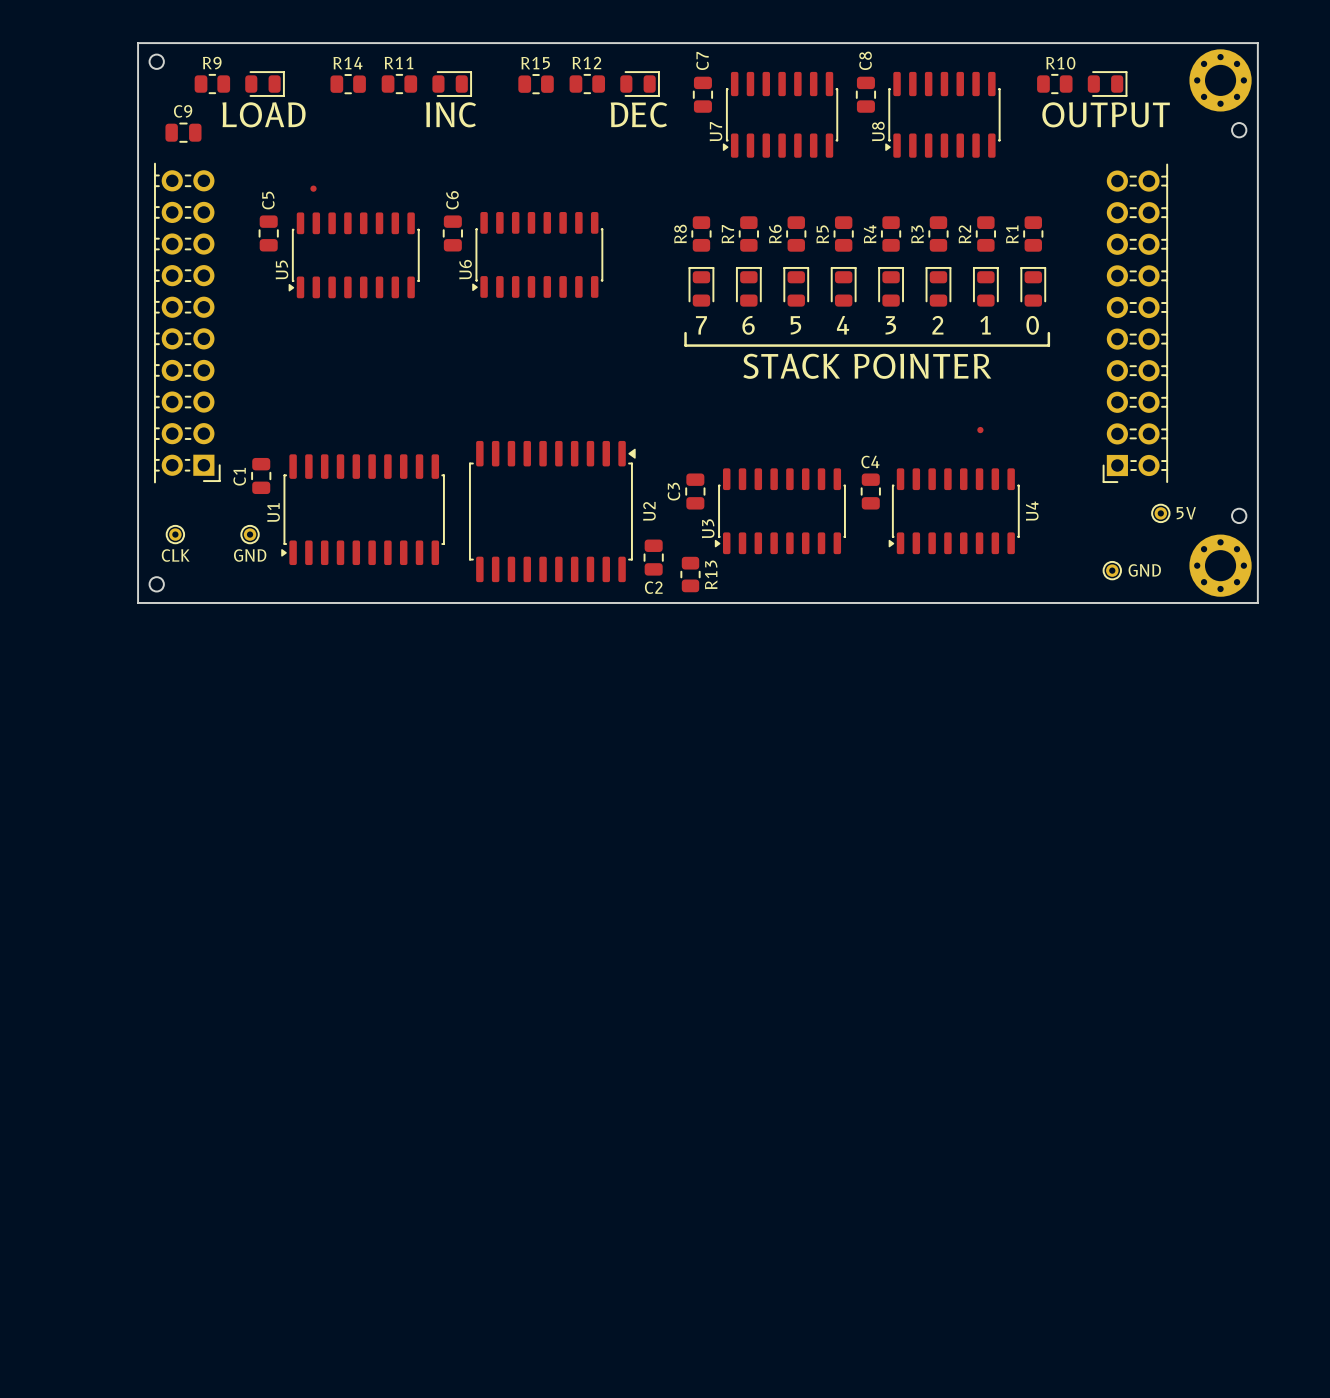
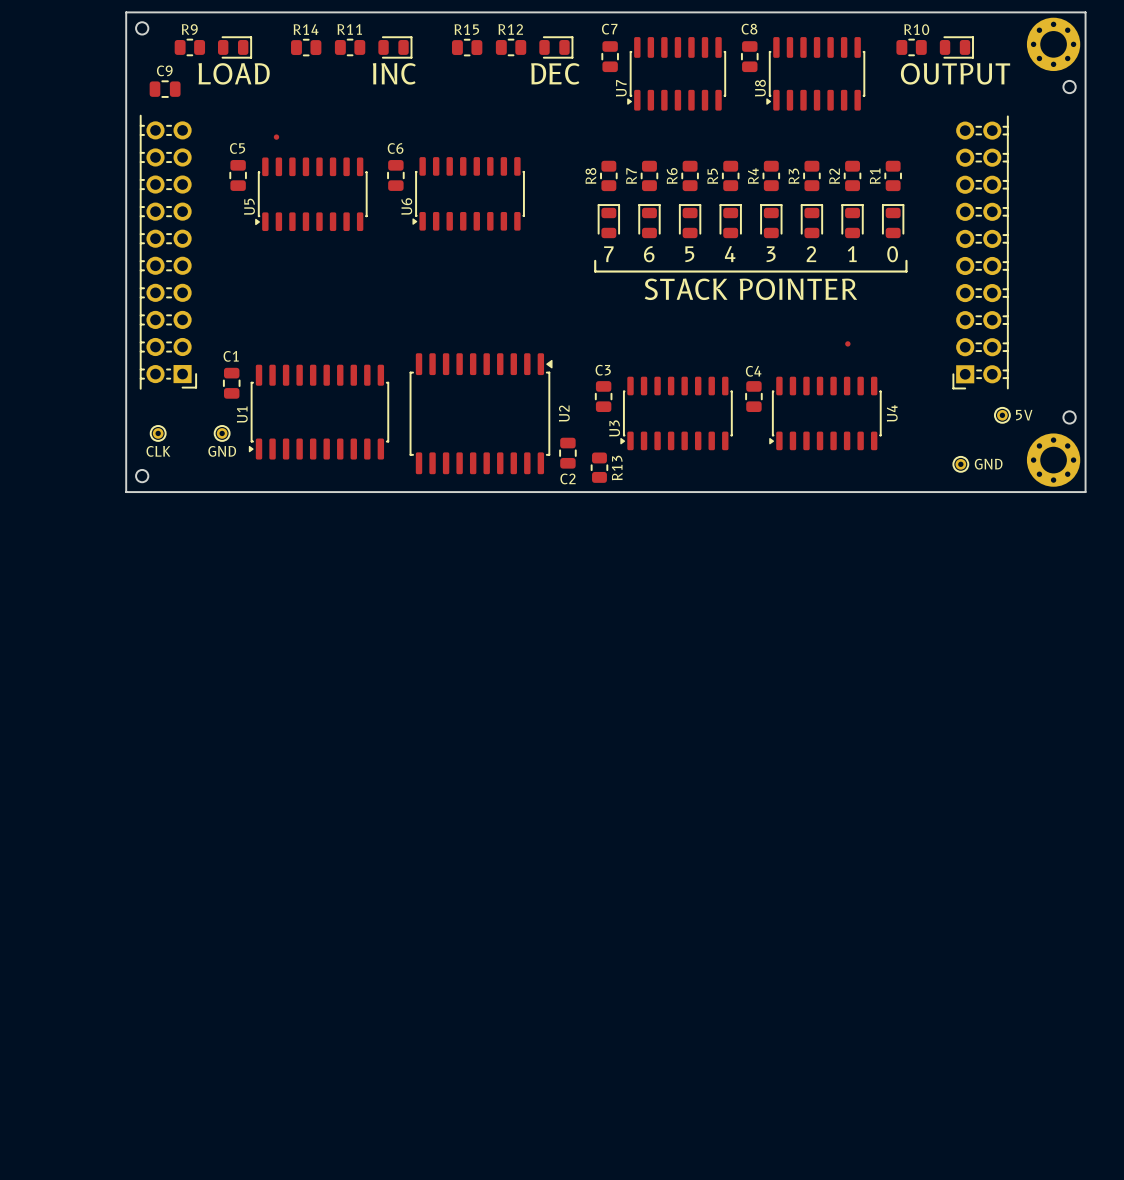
C7 name rotation: 0° (702, 60) -> 90° clockwise (609, 29)
C8 name rotation: 0° (865, 60) -> 90° clockwise (749, 29)
C5 name rotation: 0° (268, 200) -> 90° clockwise (237, 148)
C6 name rotation: 0° (452, 200) -> 90° clockwise (395, 148)
C1 name rotation: 0° (239, 476) -> 90° clockwise (231, 356)
C1 name position: C1 (239, 476) -> C1 (231, 356)
C3 name rotation: 0° (673, 491) -> 90° clockwise (603, 370)
C3 name position: C3 (673, 491) -> C3 (603, 370)

